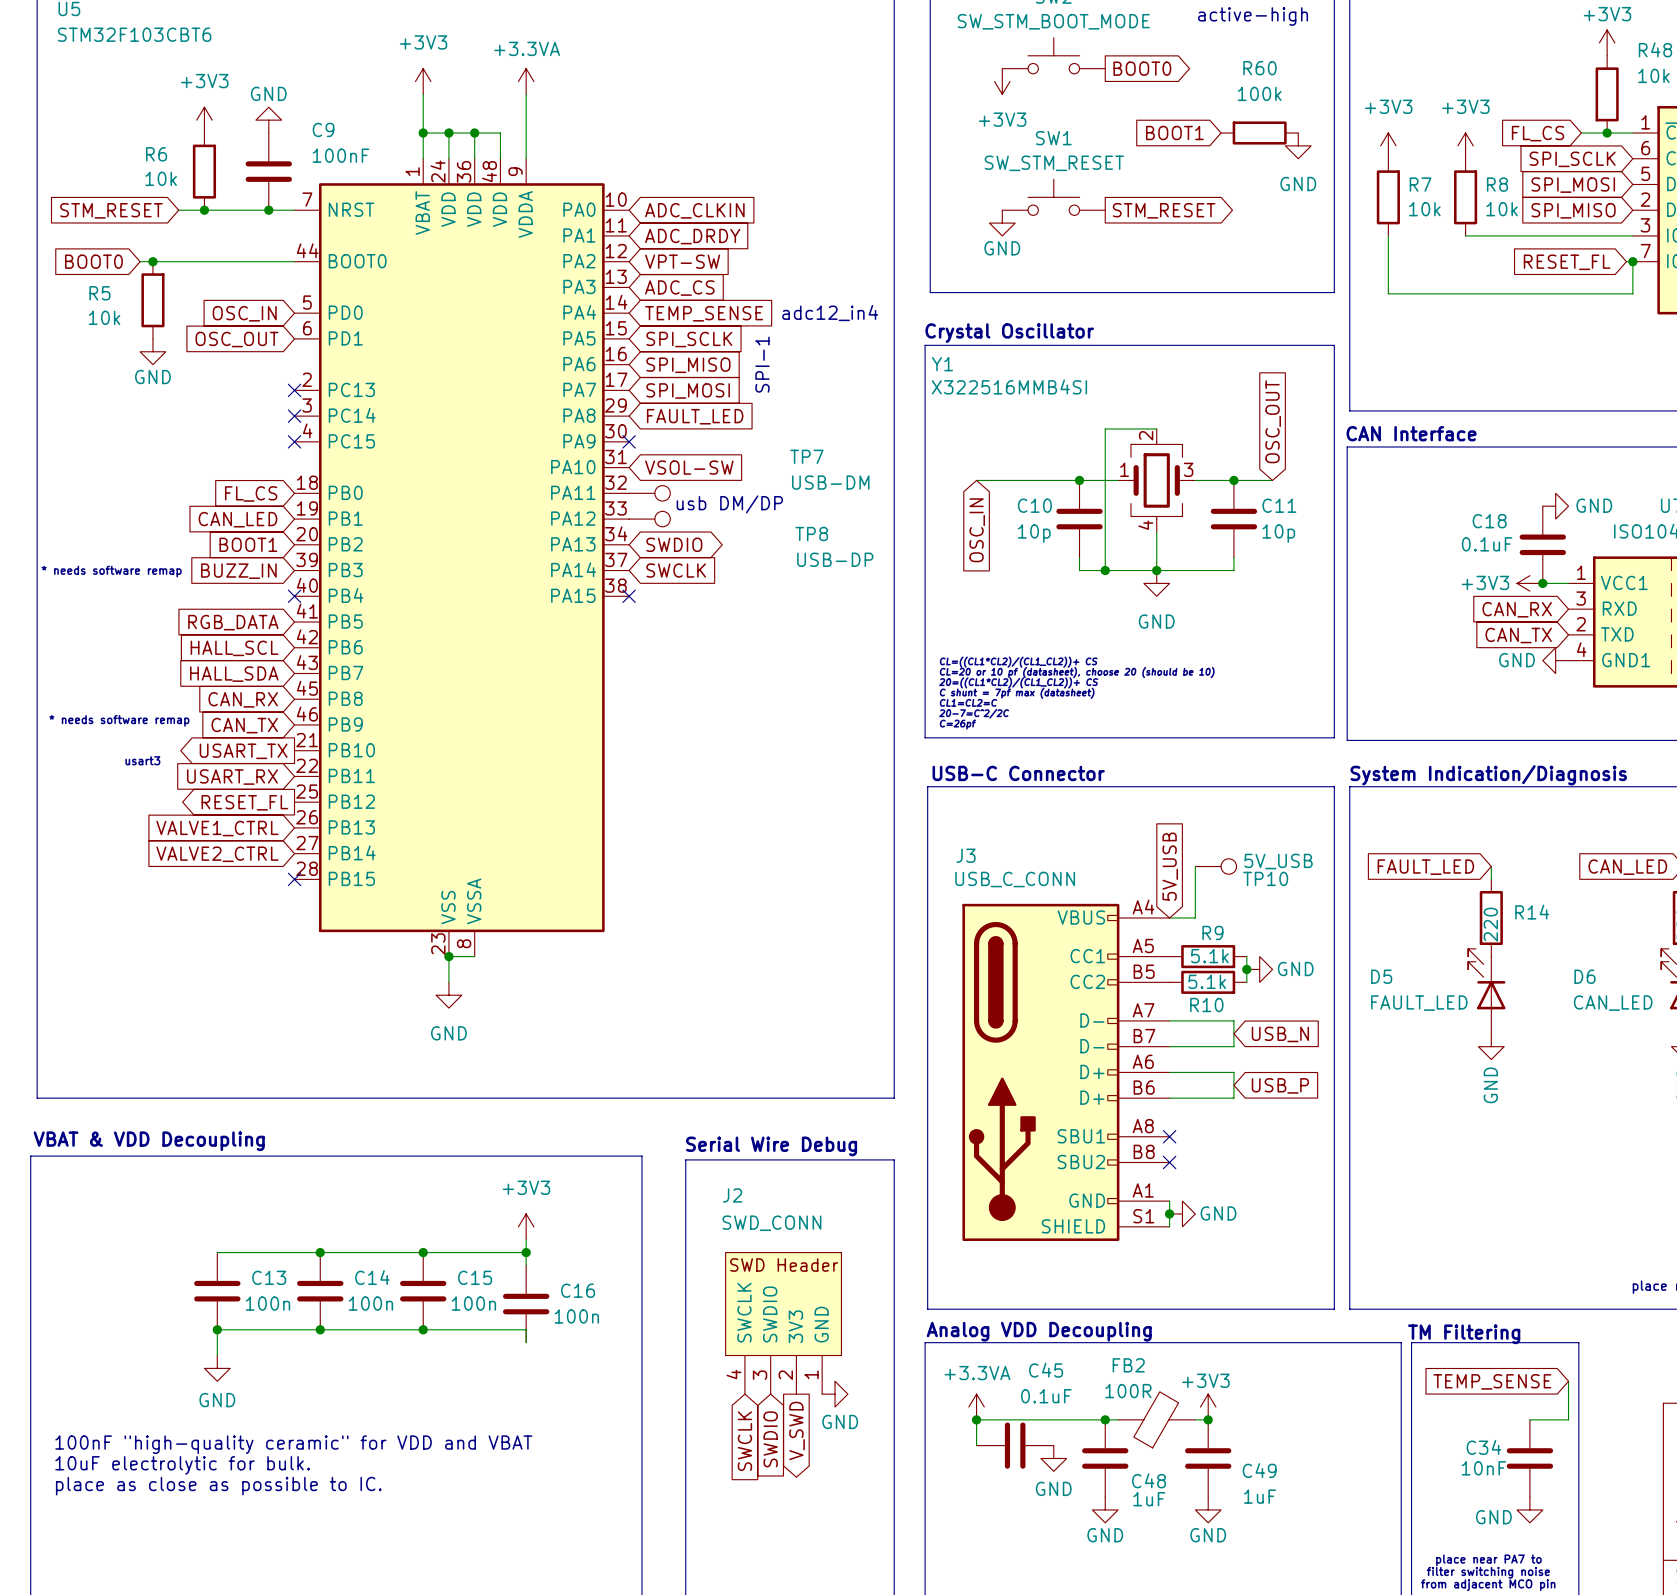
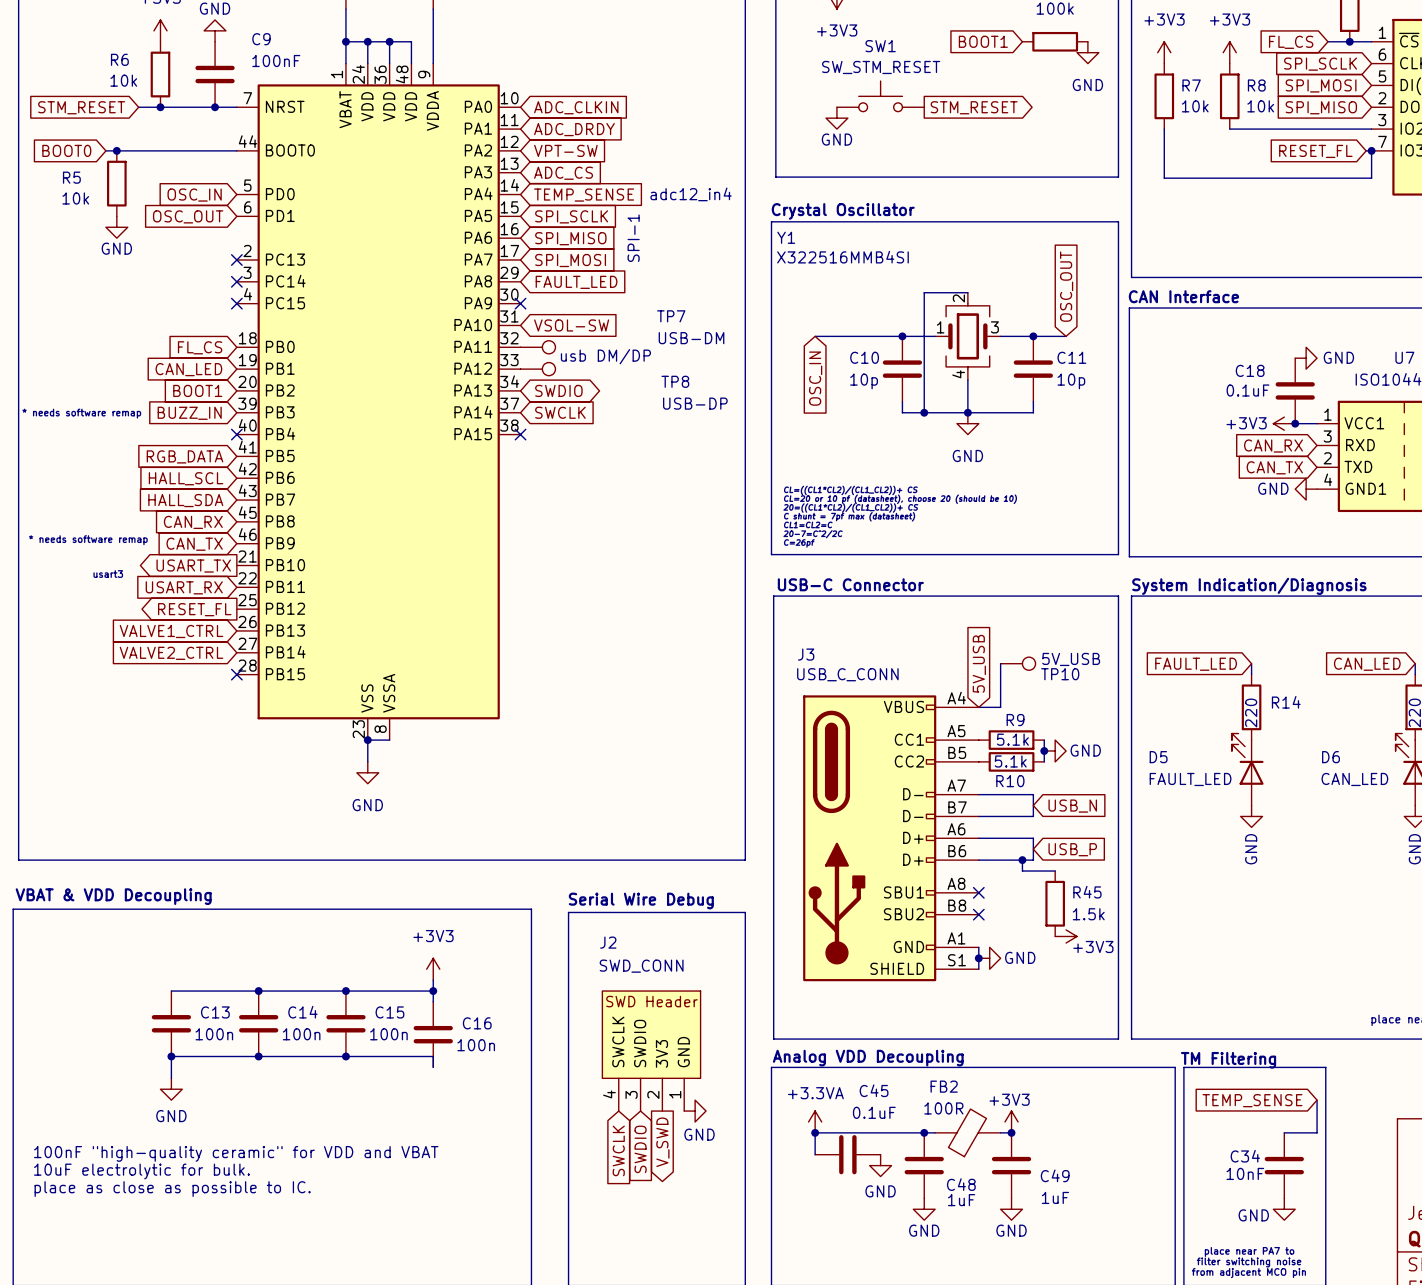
wire: none -> (1022, 860) (1022, 871) (1055, 871)
junction: none -> (1022, 860)
R45: none -> 1.5k (1055, 903)
power symbol: none -> +3V3 (1066, 936)

